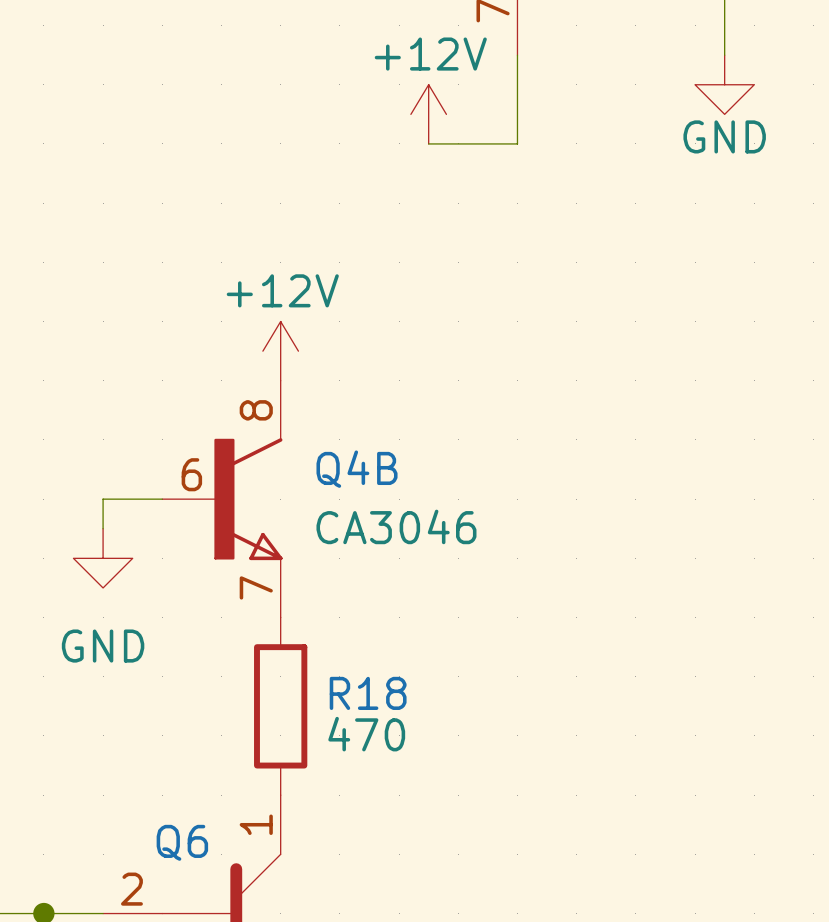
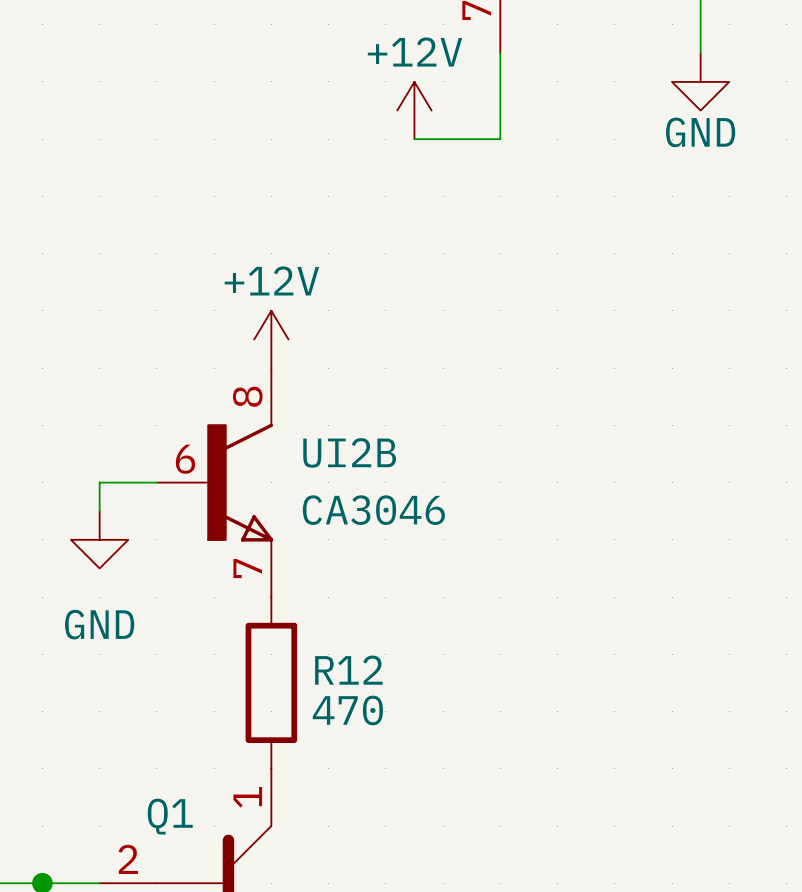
Q4B name: Q4B (357, 469) -> UI2B (349, 452)
R18 name: R18 (368, 693) -> R12 (348, 670)
Q6 name: Q6 (182, 842) -> Q1 (170, 816)

